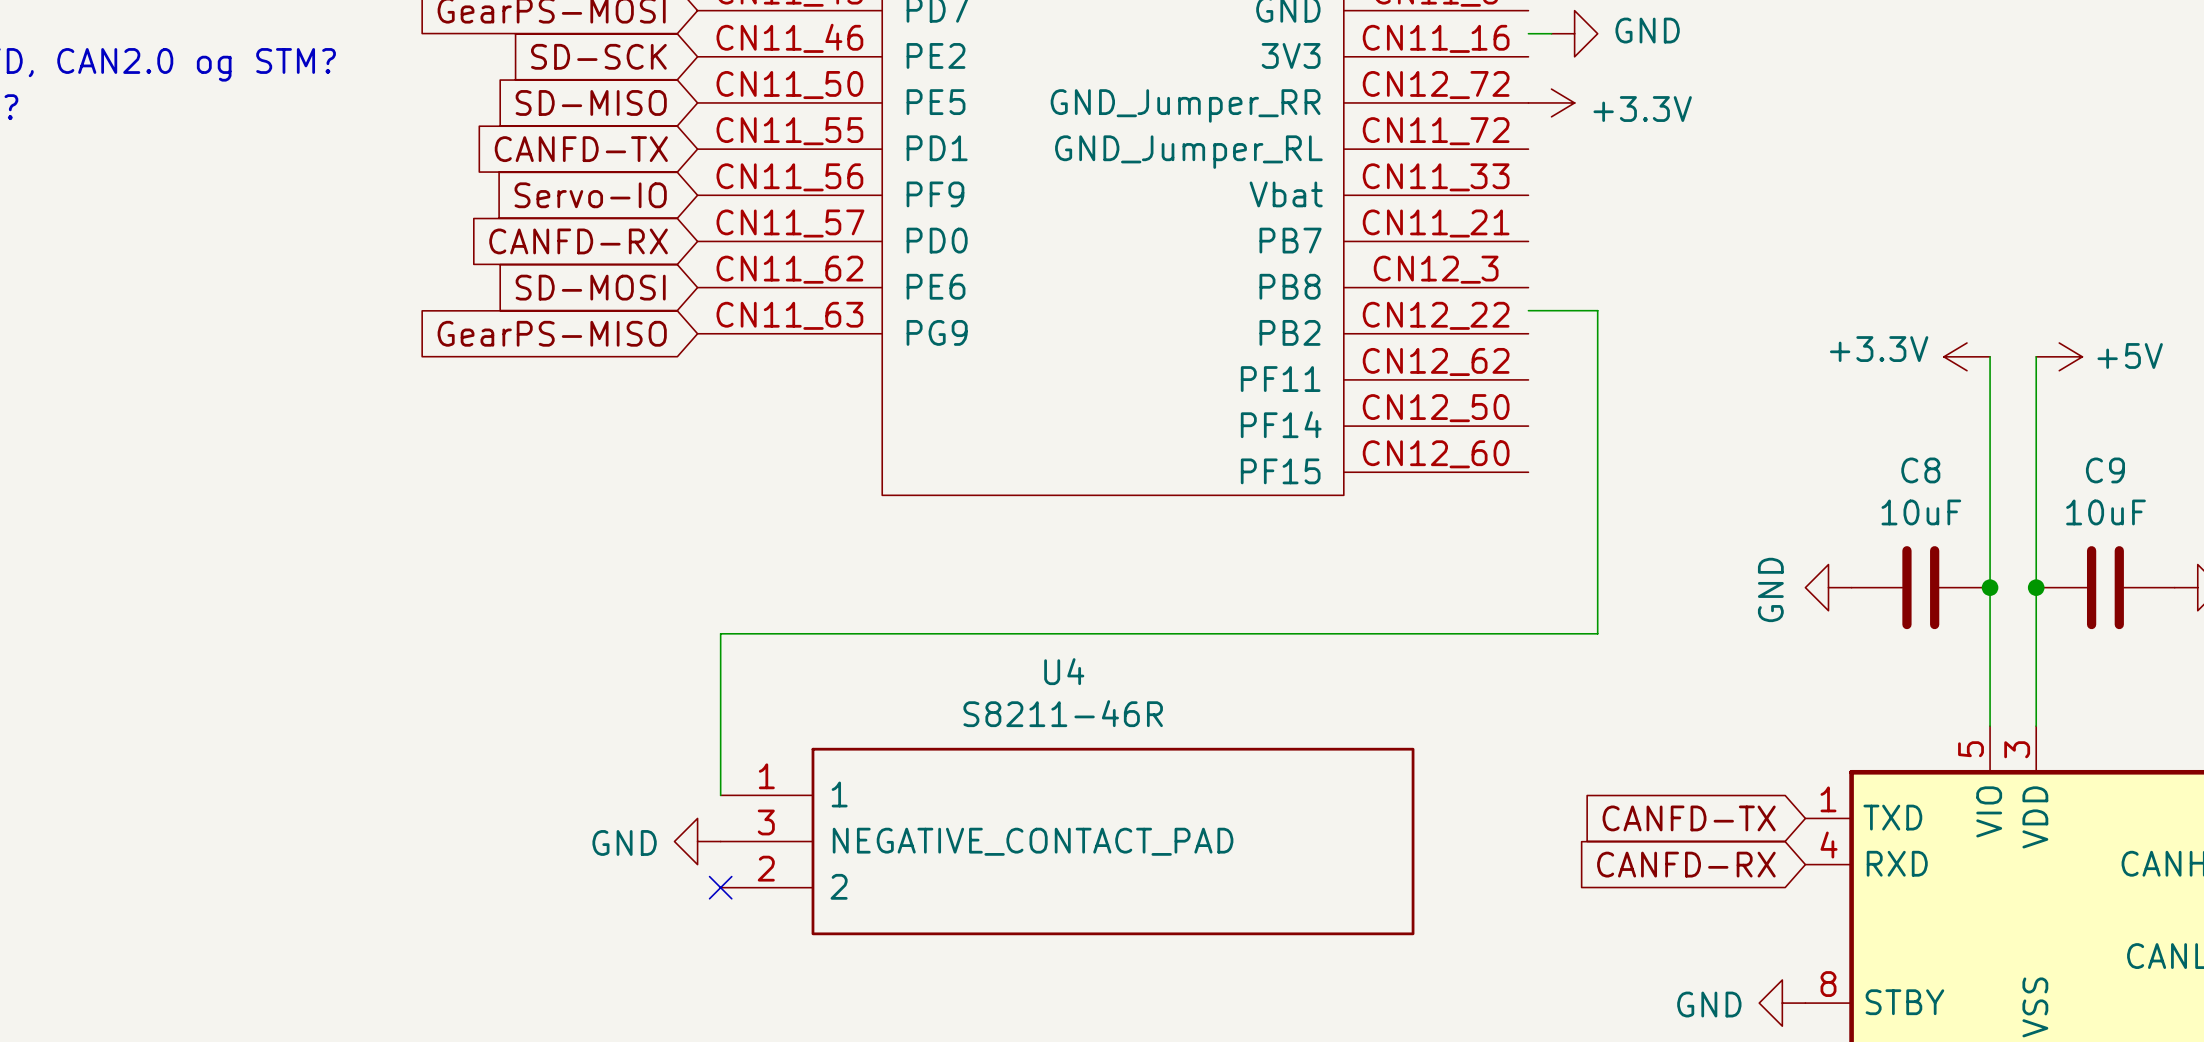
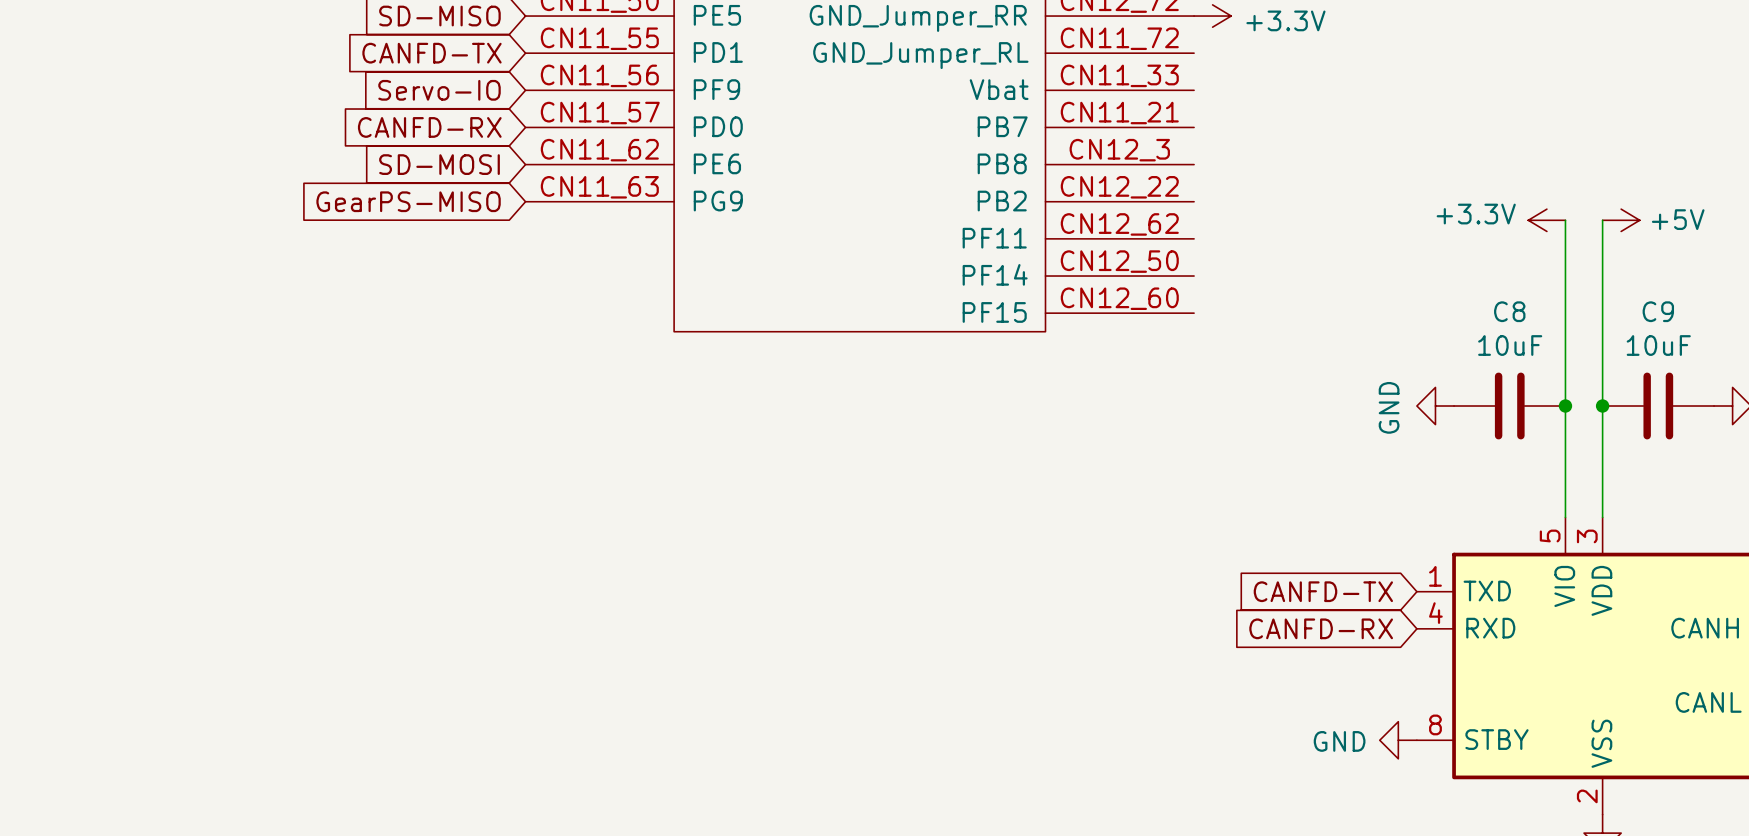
wire: (1528, 310) (1597, 310) (1597, 633) (720, 633) (720, 795) -> none
power symbol: GND (697, 841) -> none
U4: S8211-46R (1067, 841) -> none
no-connect mark: (720, 887) -> none

